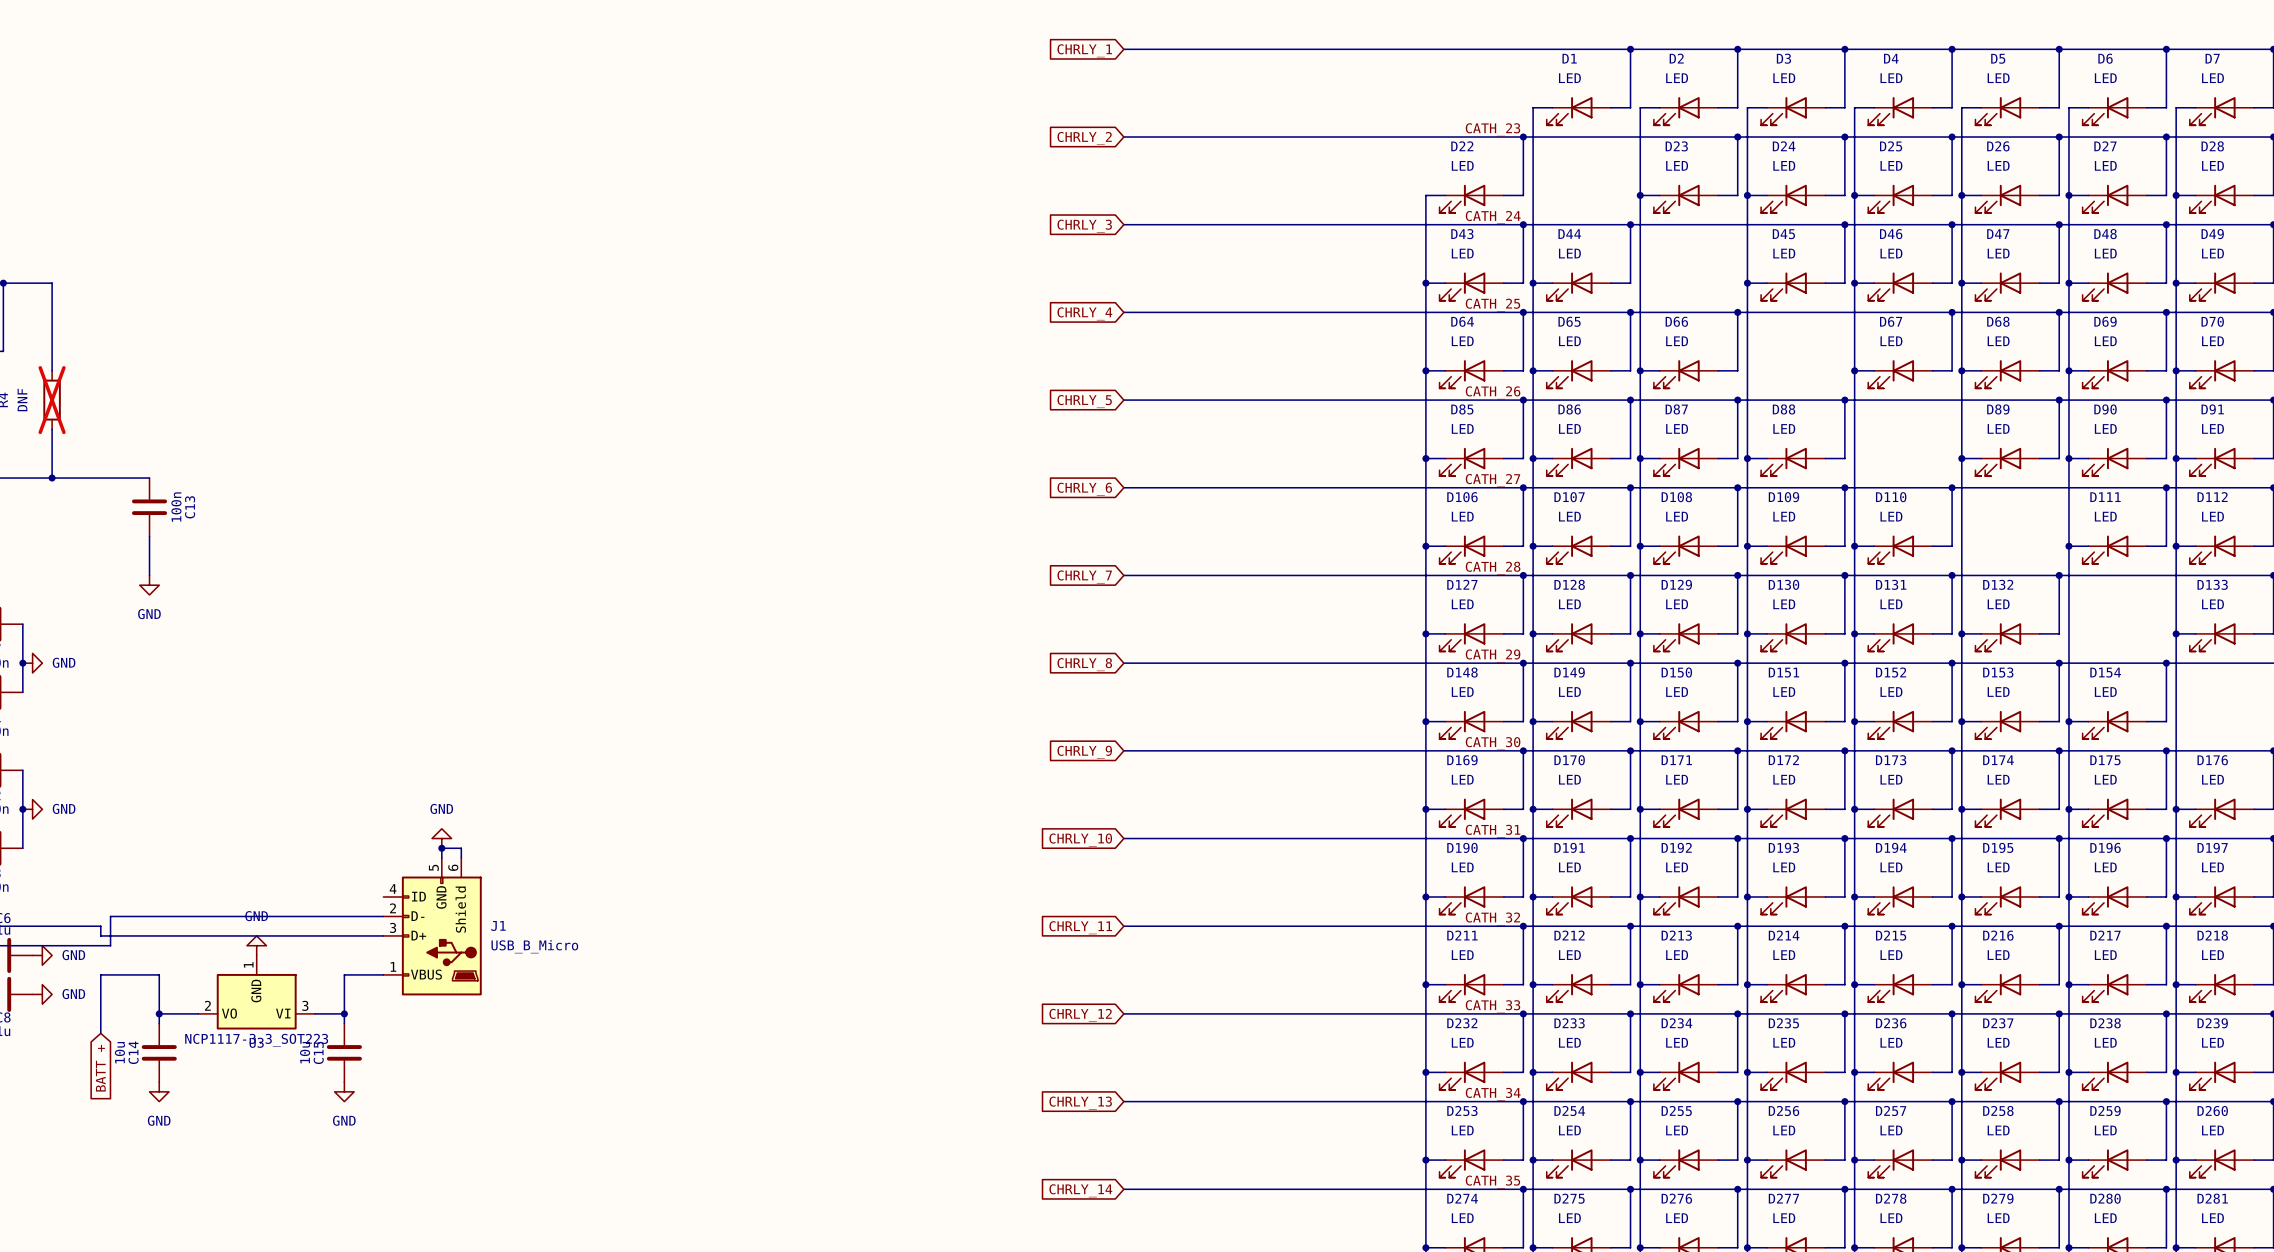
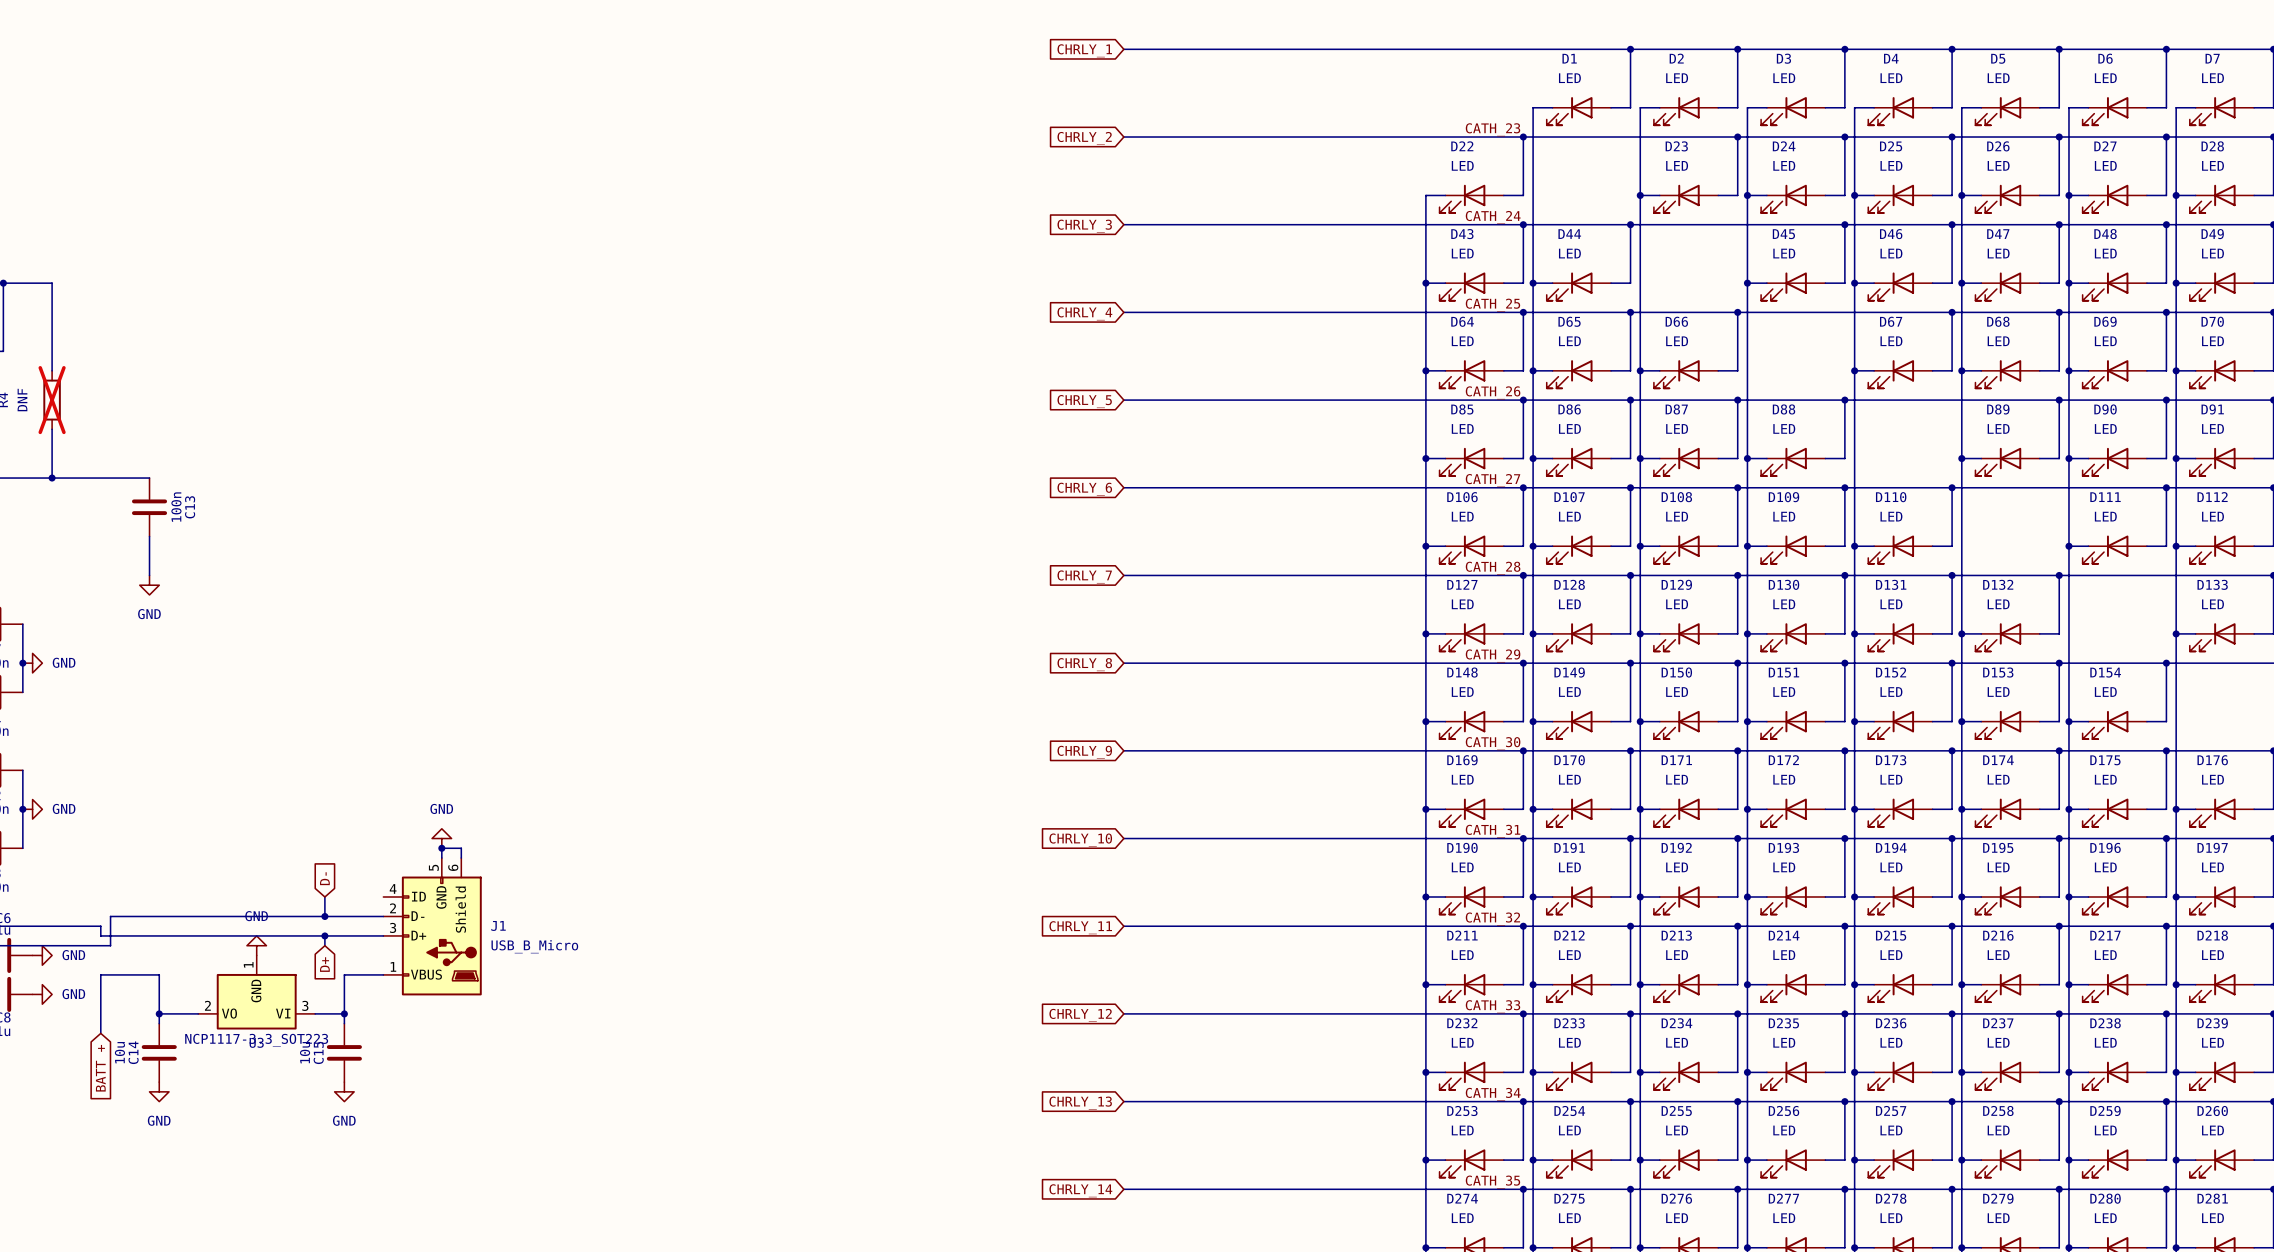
global label: none -> D- (324, 878)
wire: none -> (324, 896) (324, 916)
junction: none -> (324, 916)
wire: none -> (324, 935) (324, 945)
junction: none -> (324, 935)
global label: none -> D+ (324, 964)

